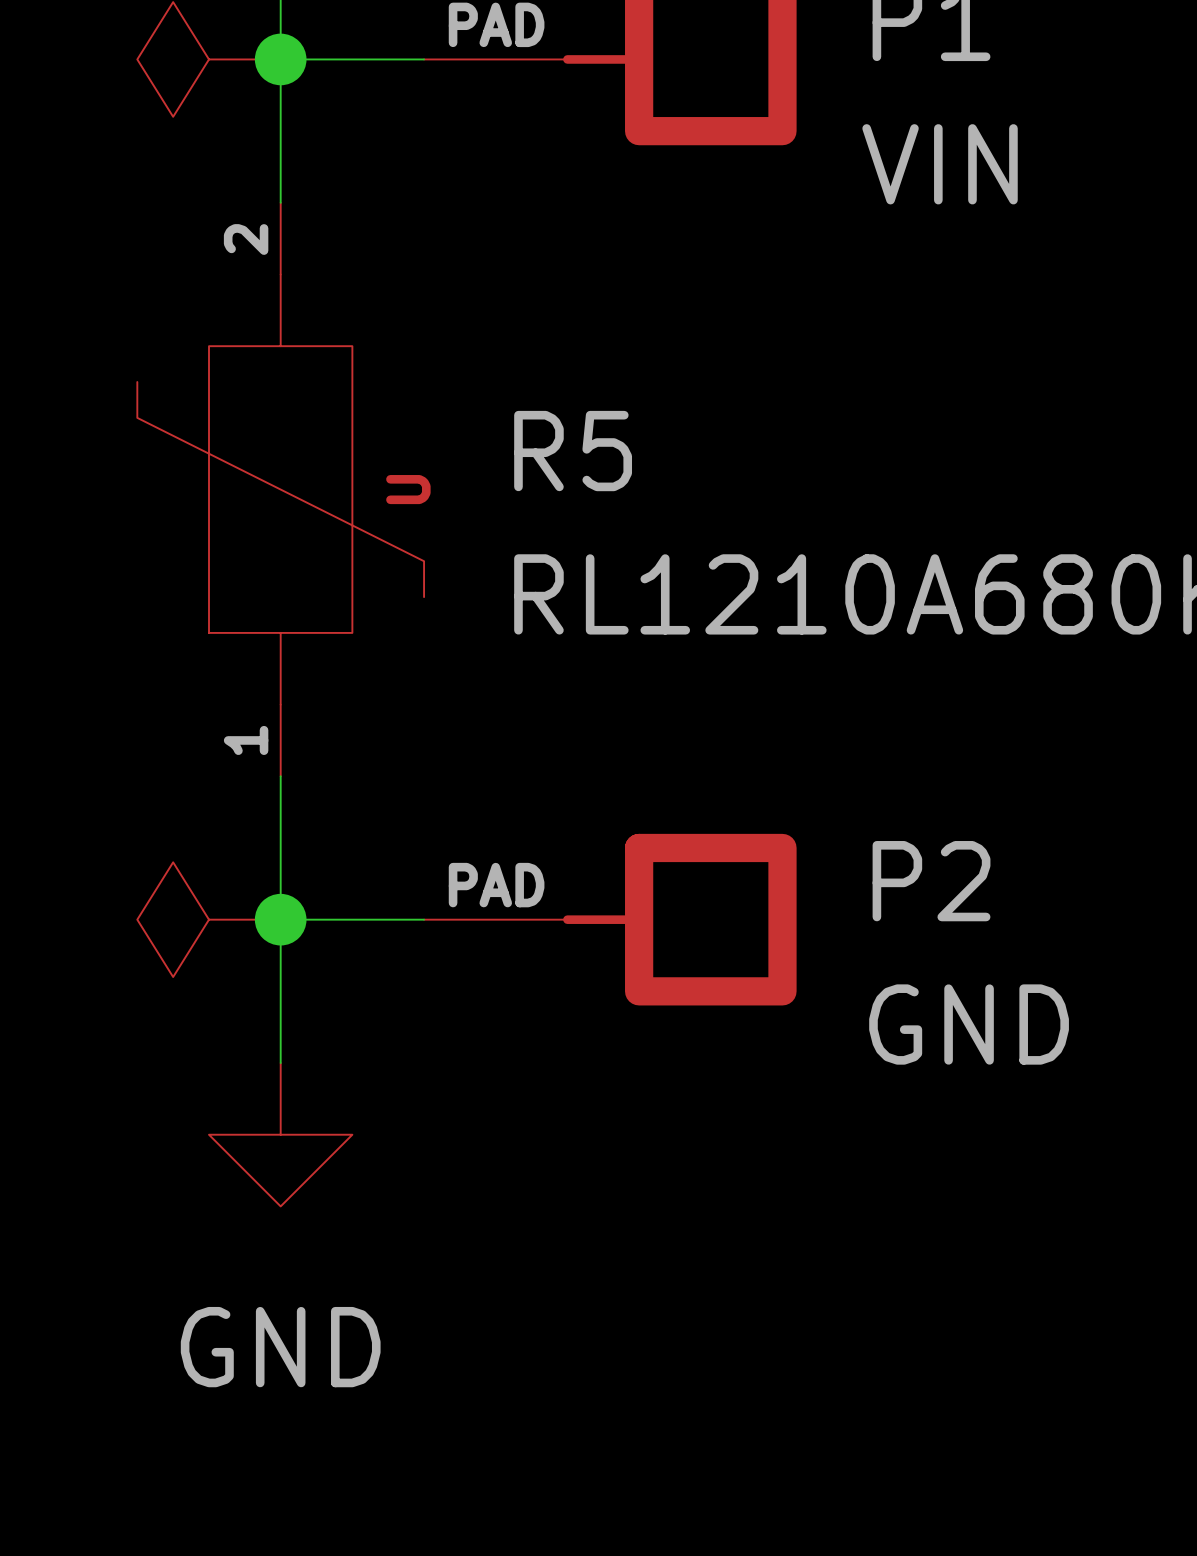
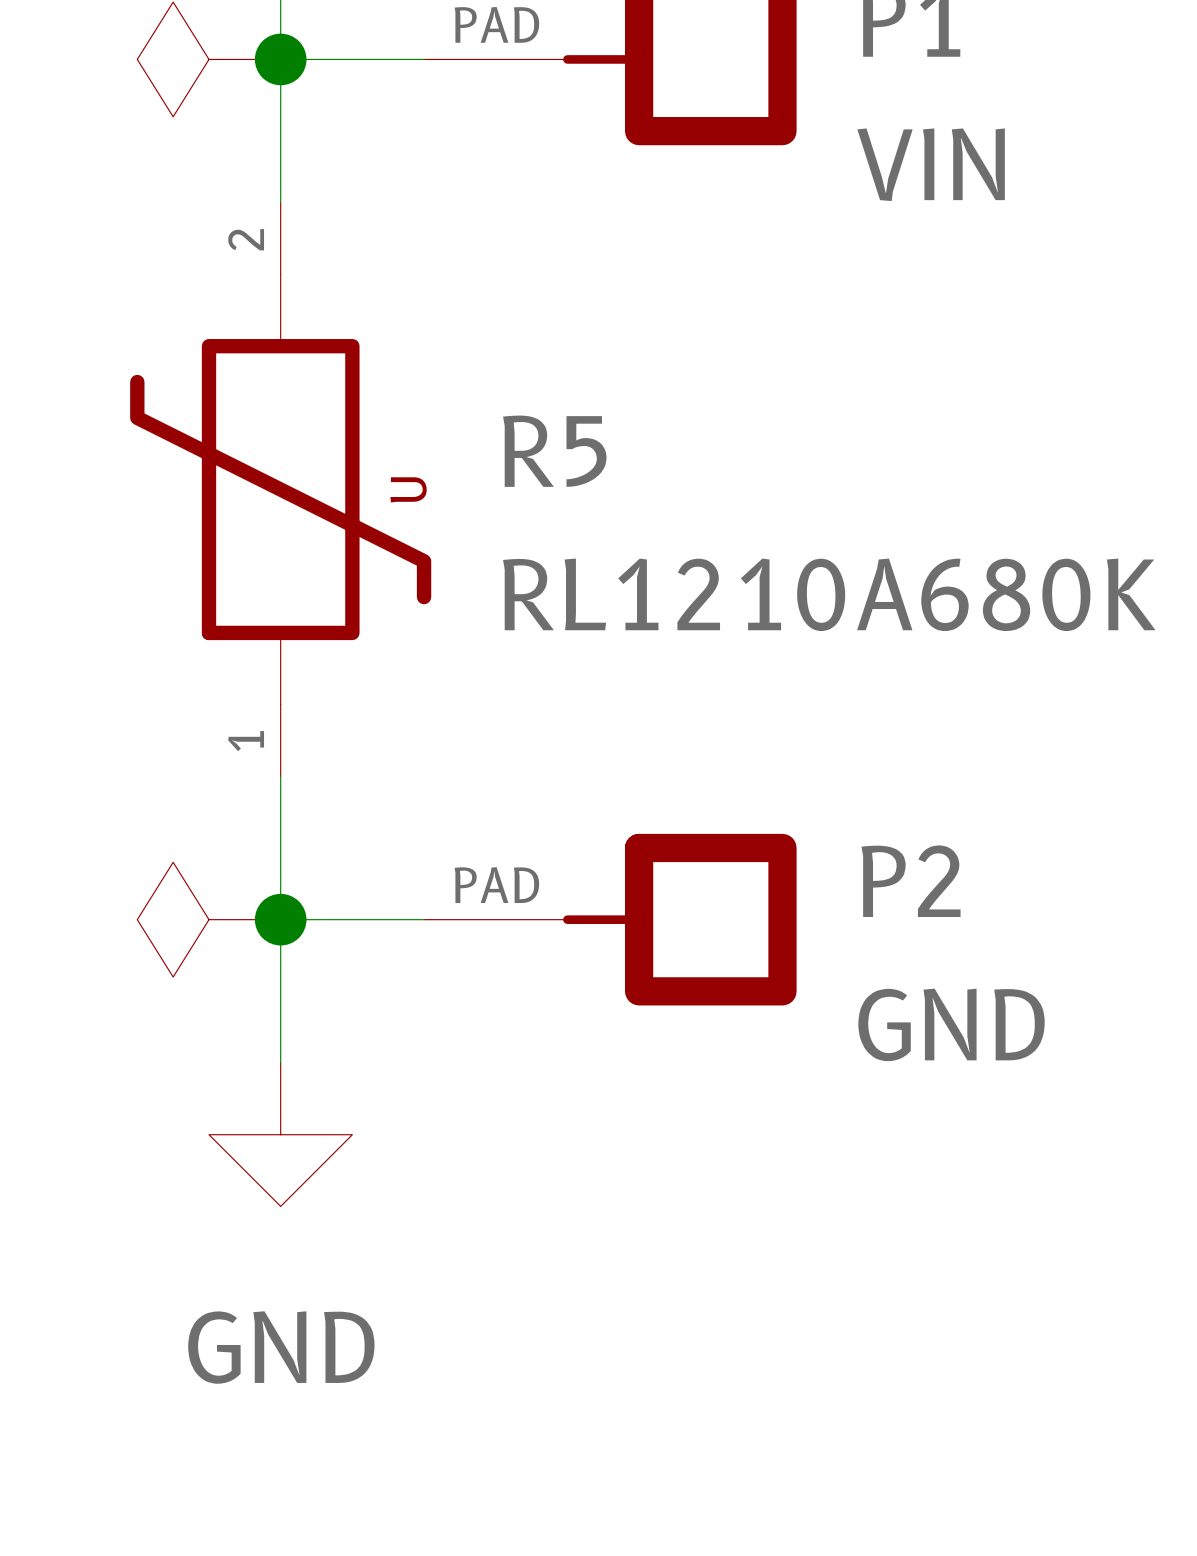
R5 symbol: [137, 202, 425, 777] -> [130, 202, 432, 777]

